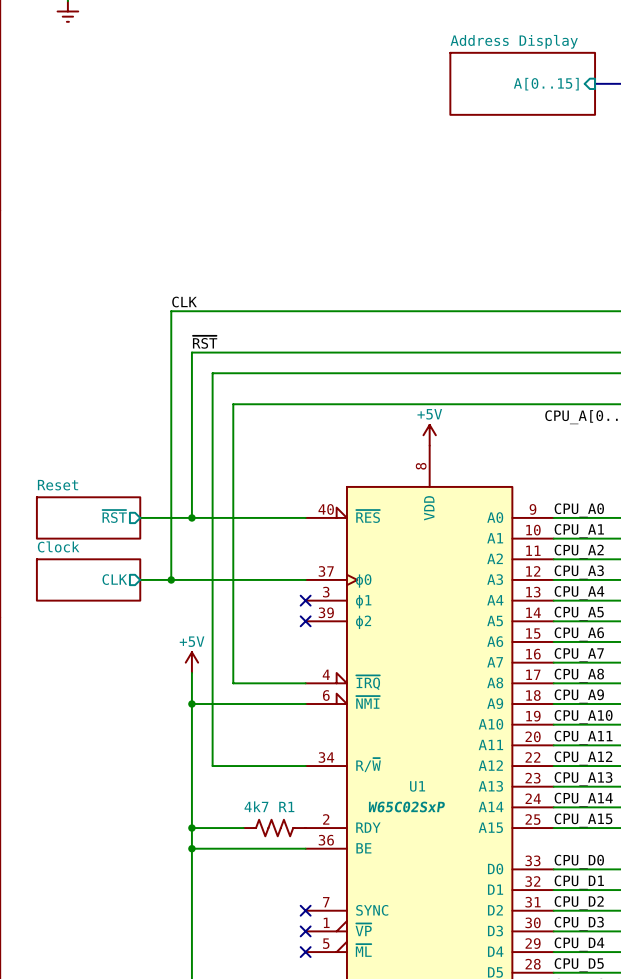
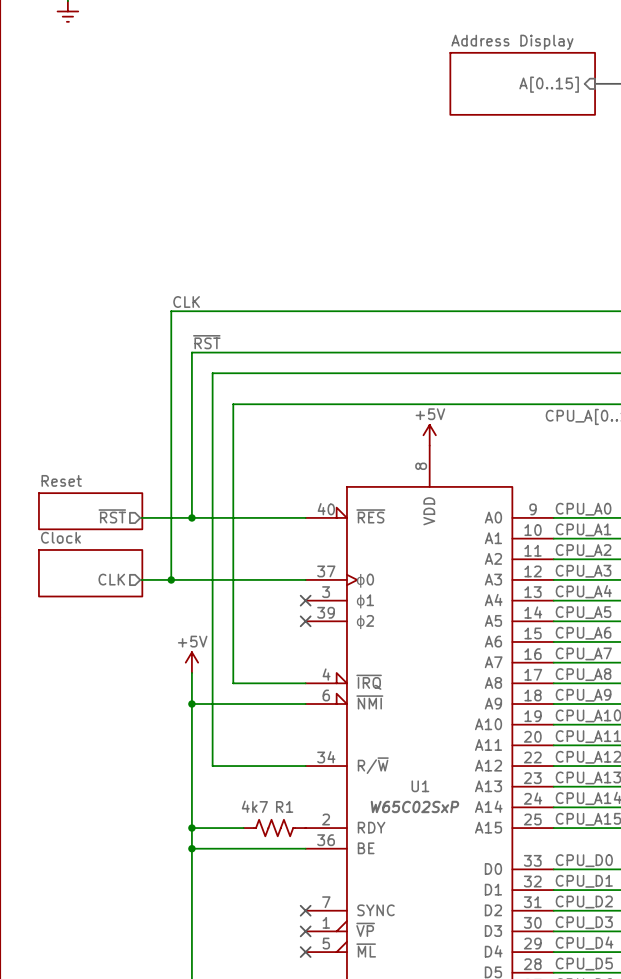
sheet Reset shape: [36, 496, 141, 540] -> [38, 492, 143, 530]
sheet Clock shape: [36, 558, 141, 602] -> [38, 549, 143, 598]

